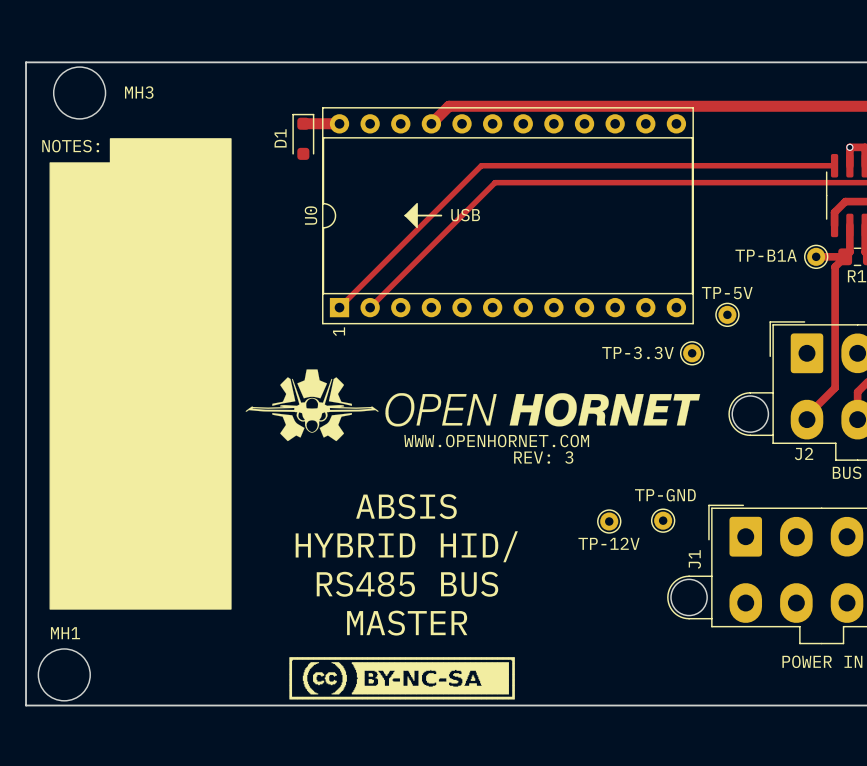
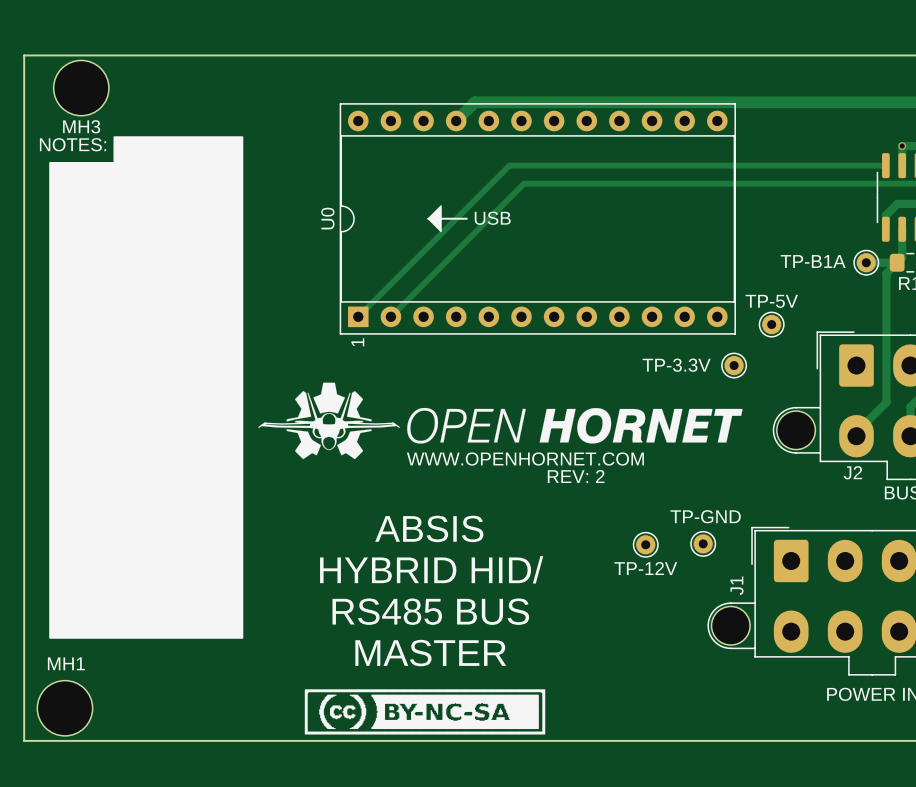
MH3 name position: MH3 (139, 92) -> MH3 (81, 126)
track: (303, 123) (339, 123) -> none
D1: (303, 136) -> none
text: REV: 3 (543, 457) -> REV: 2 (576, 476)

